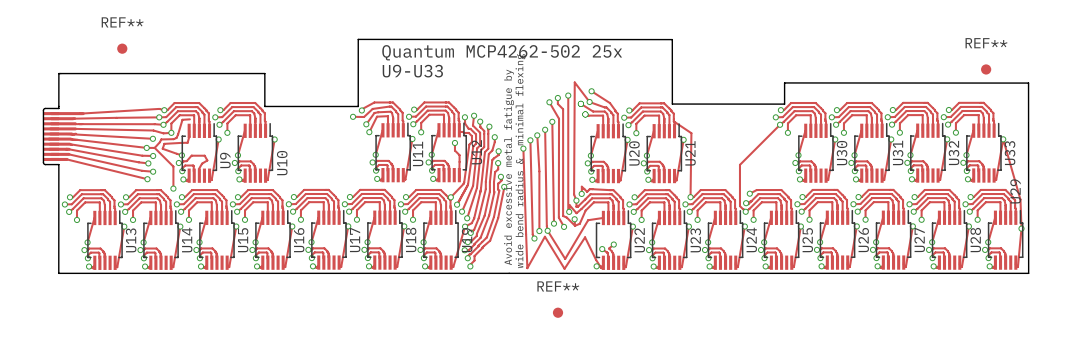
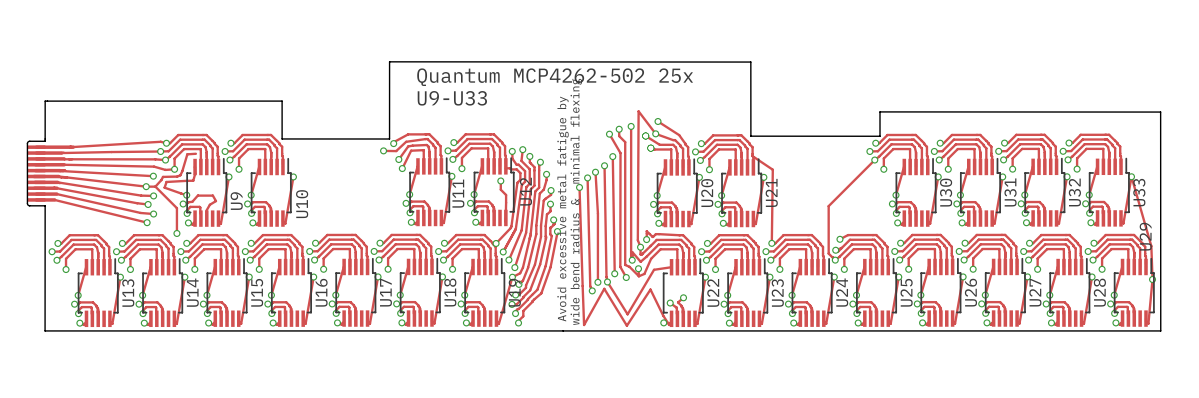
REF**: (122, 48) -> none
REF**: (986, 69) -> none
REF**: (558, 312) -> none

